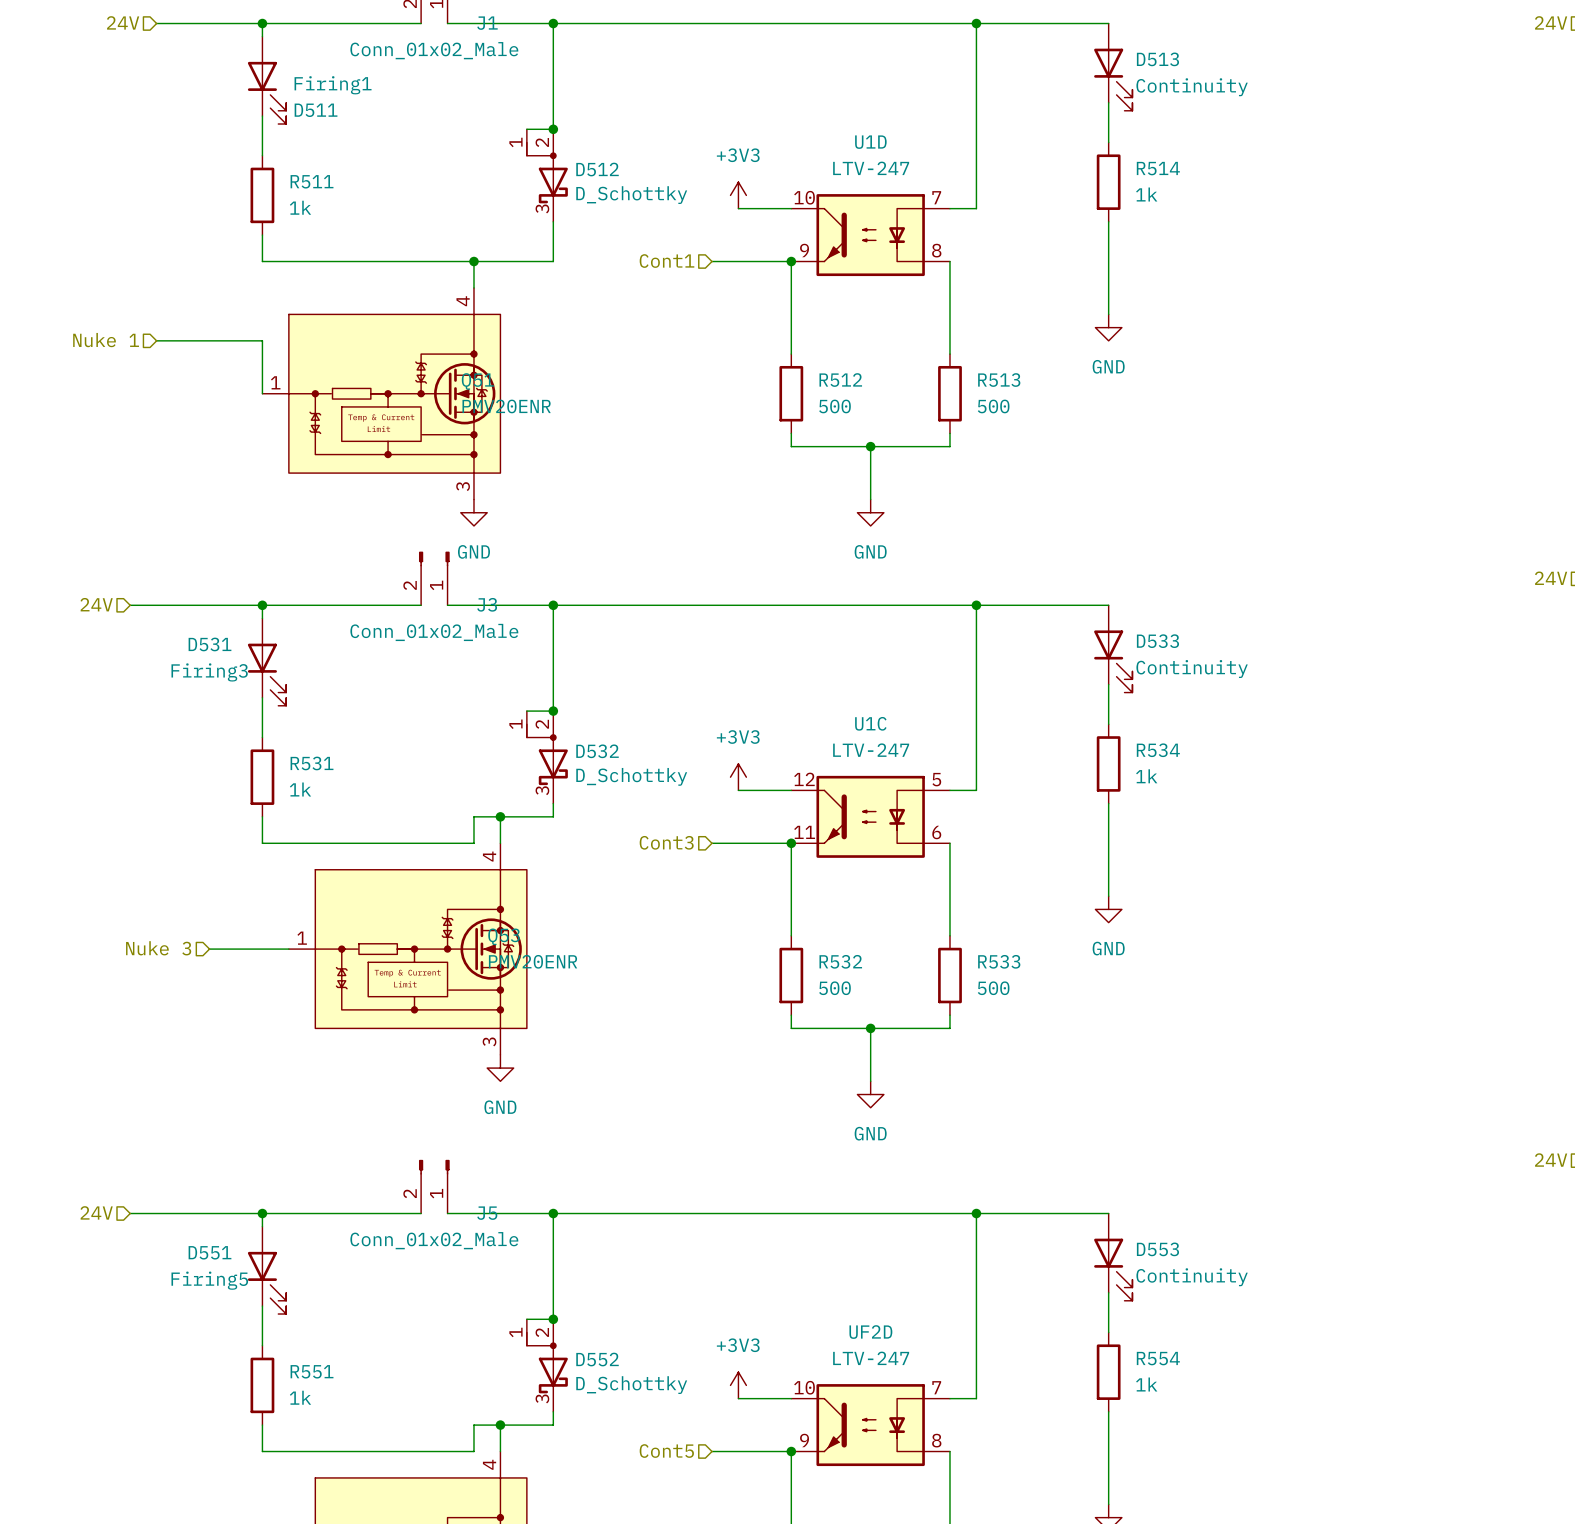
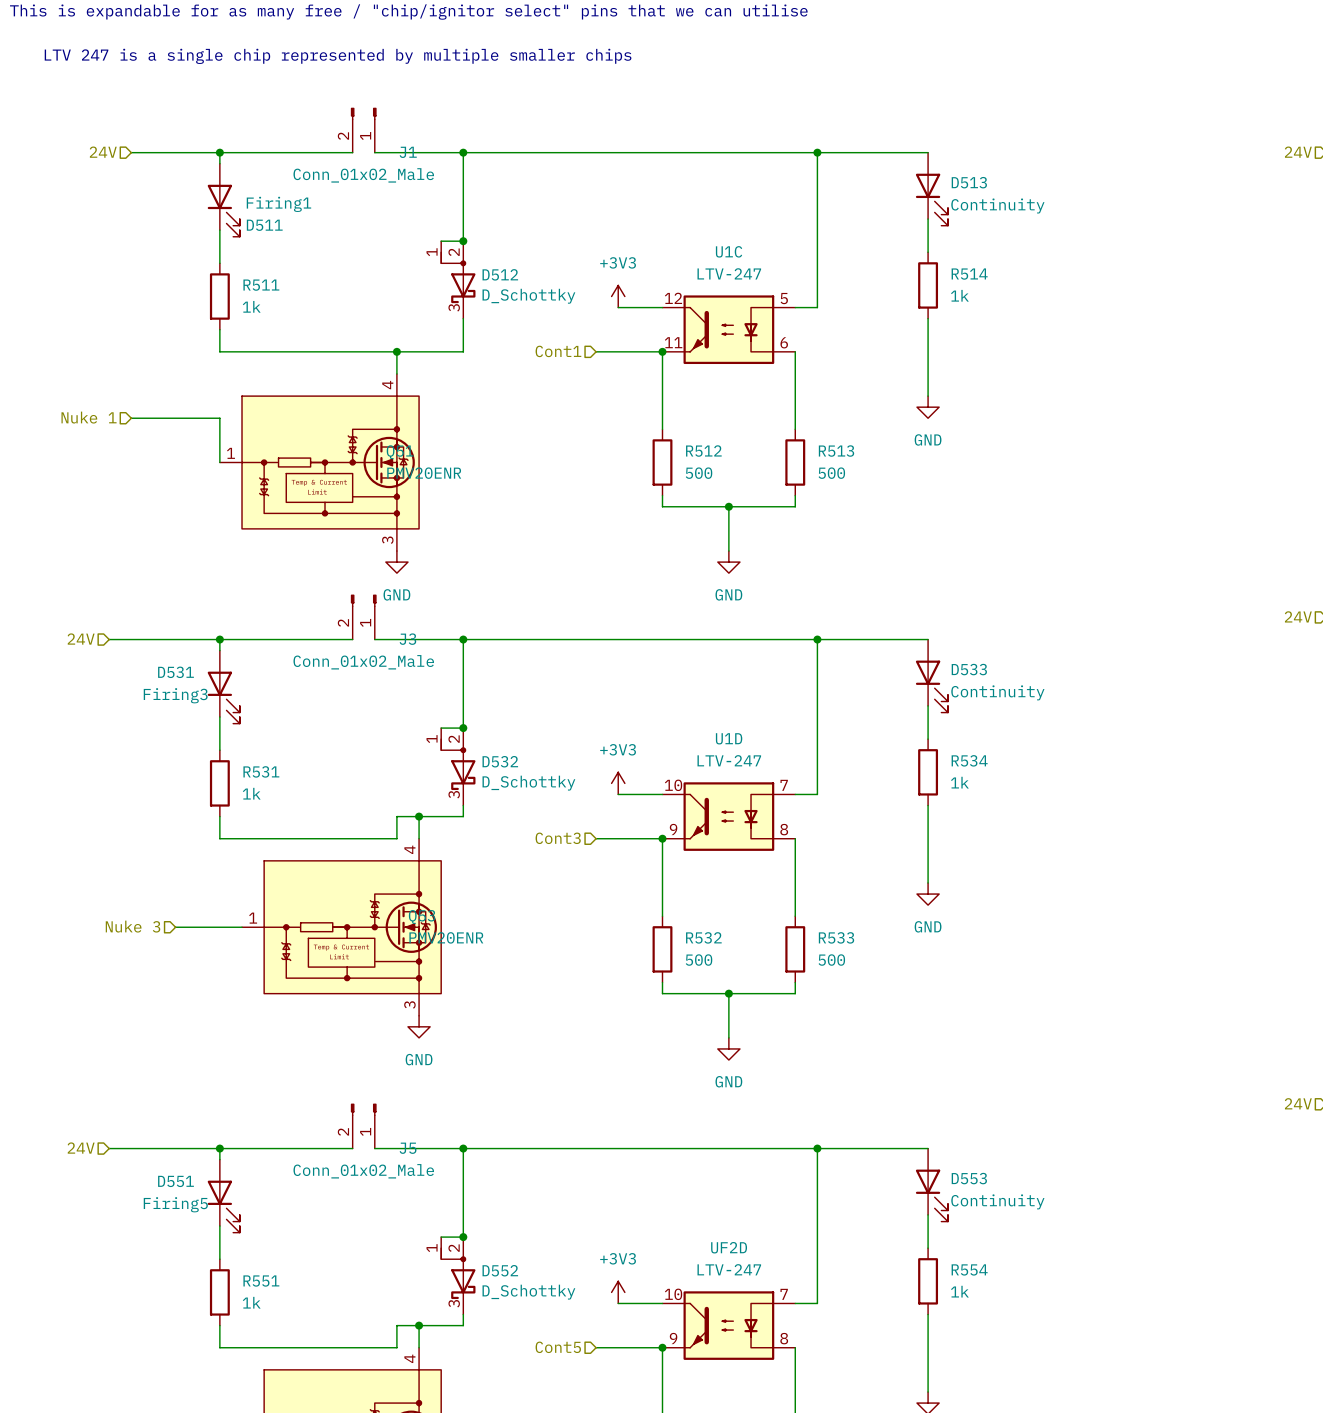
U1D position: (870, 235) -> (728, 816)
U1C position: (870, 816) -> (728, 329)

